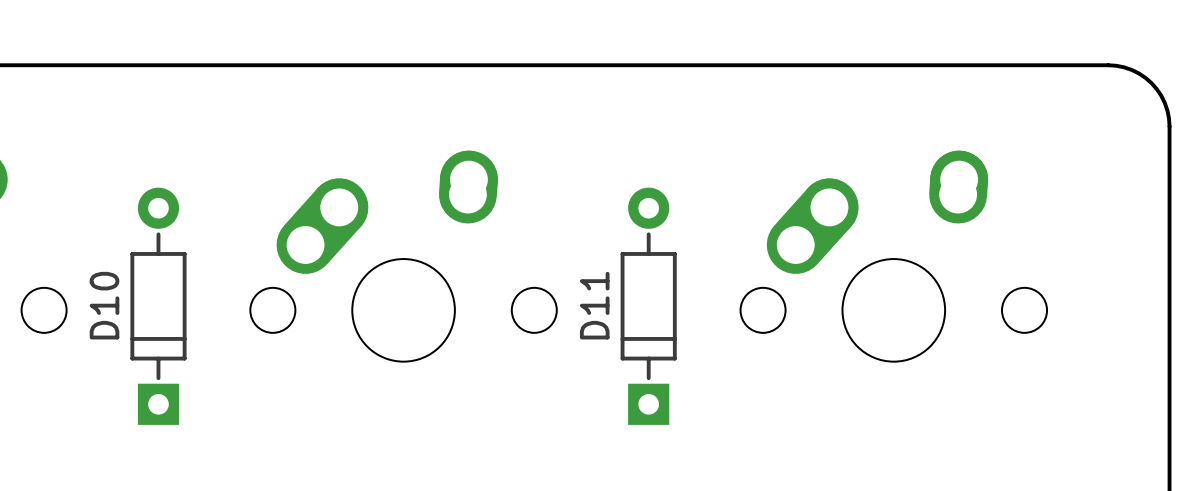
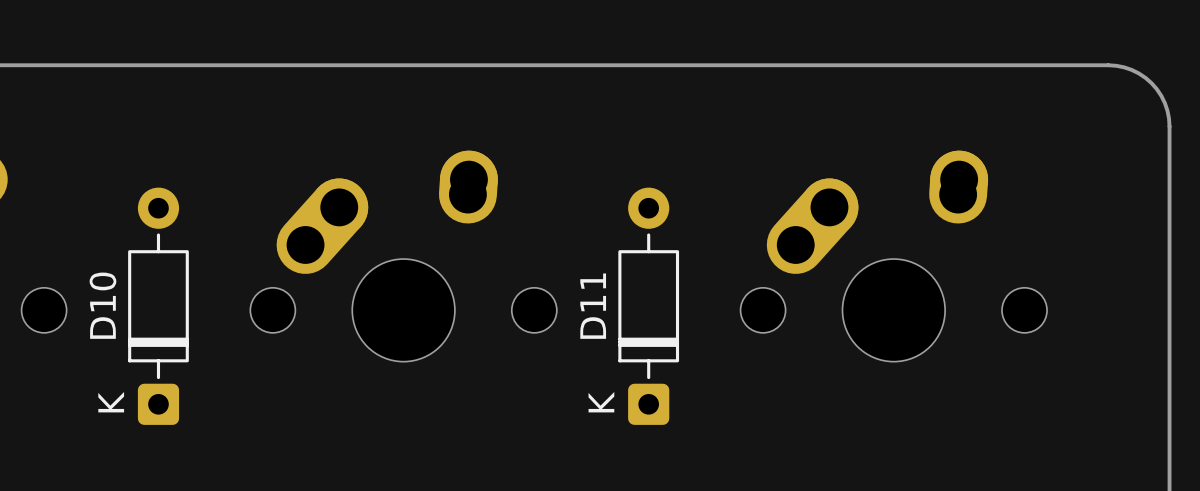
D10 footprint: [130, 187, 187, 425] -> [128, 187, 189, 425]
D11 footprint: [620, 187, 677, 425] -> [618, 187, 680, 425]

